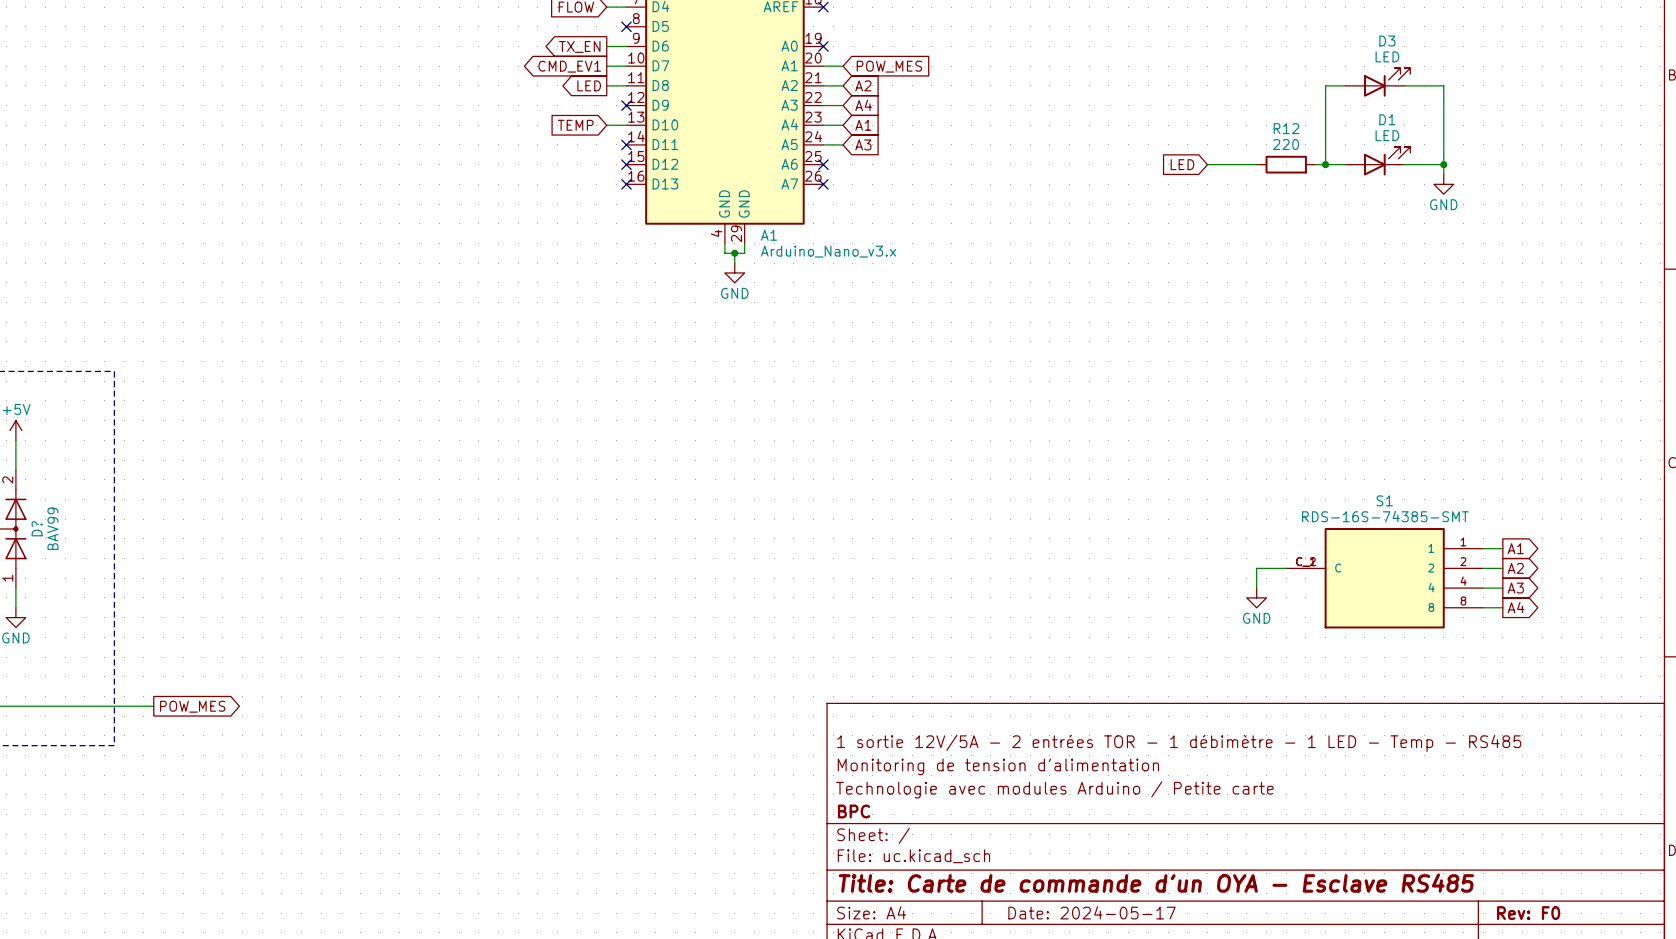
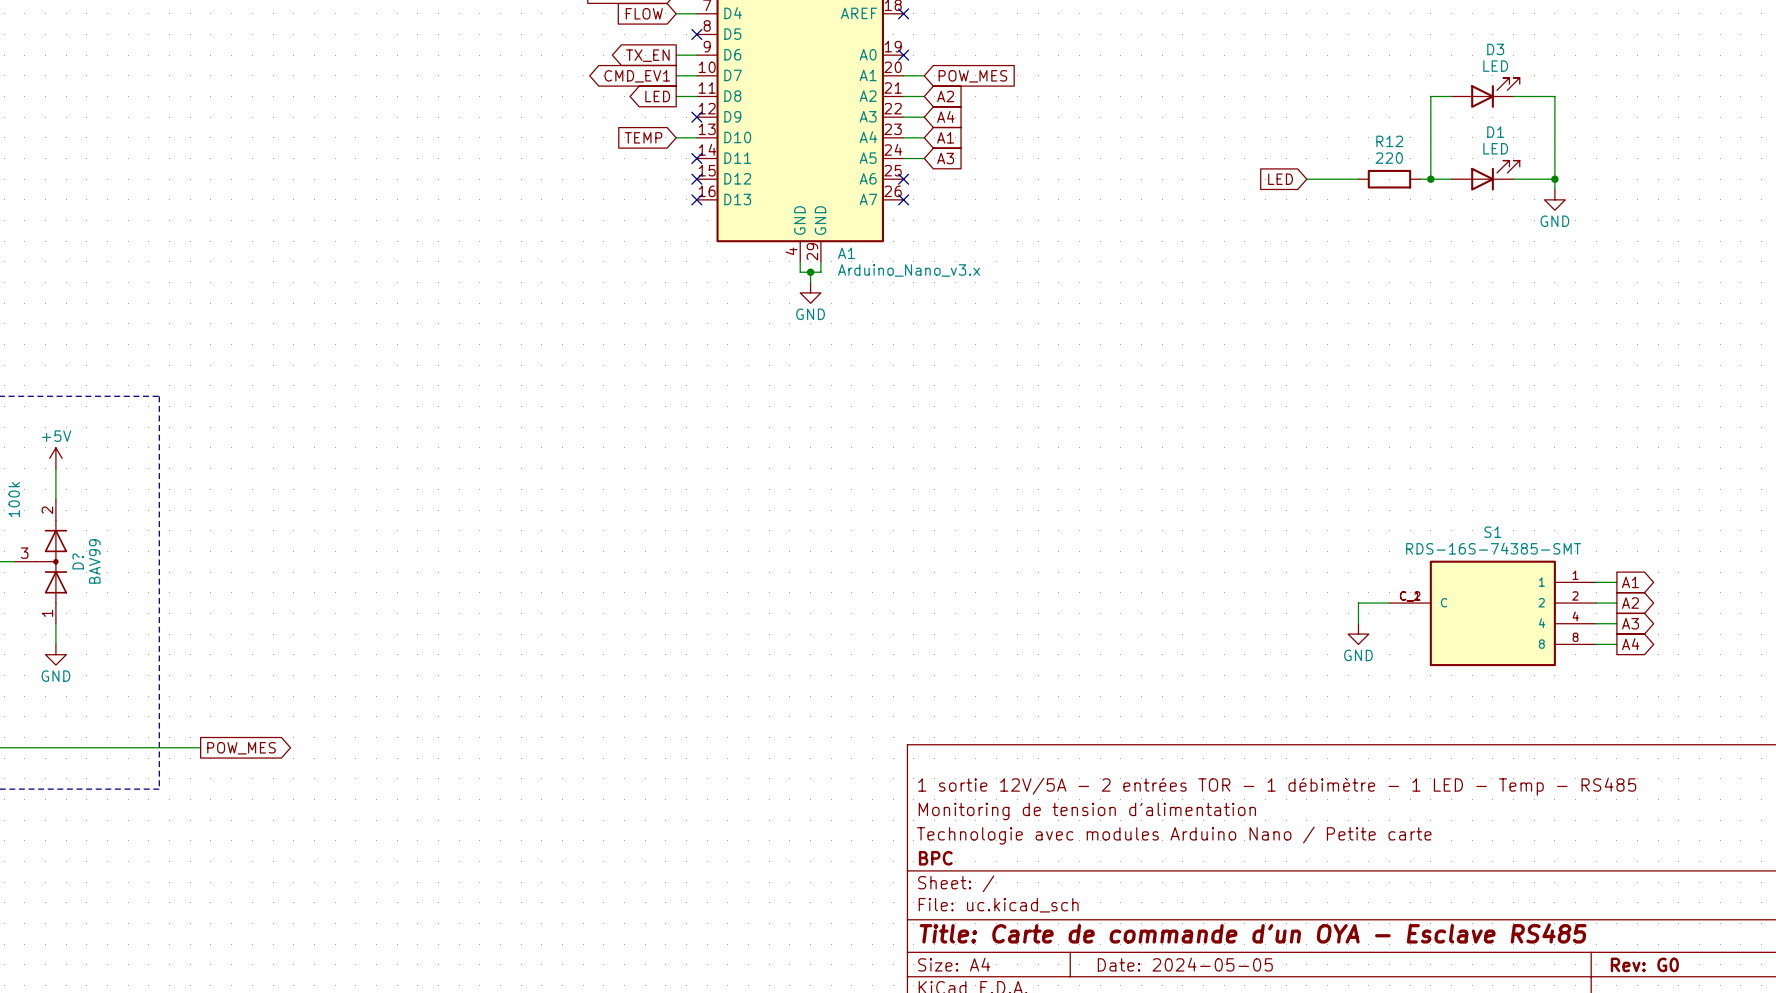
title block: Technologie avec modules Arduino / Petite carte (1054, 789) -> Technologie avec modules Arduino Nano / Petite carte (1174, 835)
title block: Date: 2024-05-17 (1091, 912) -> Date: 2024-05-05 (1185, 964)
title block: Rev: F0 (1528, 913) -> Rev: G0 (1644, 964)

